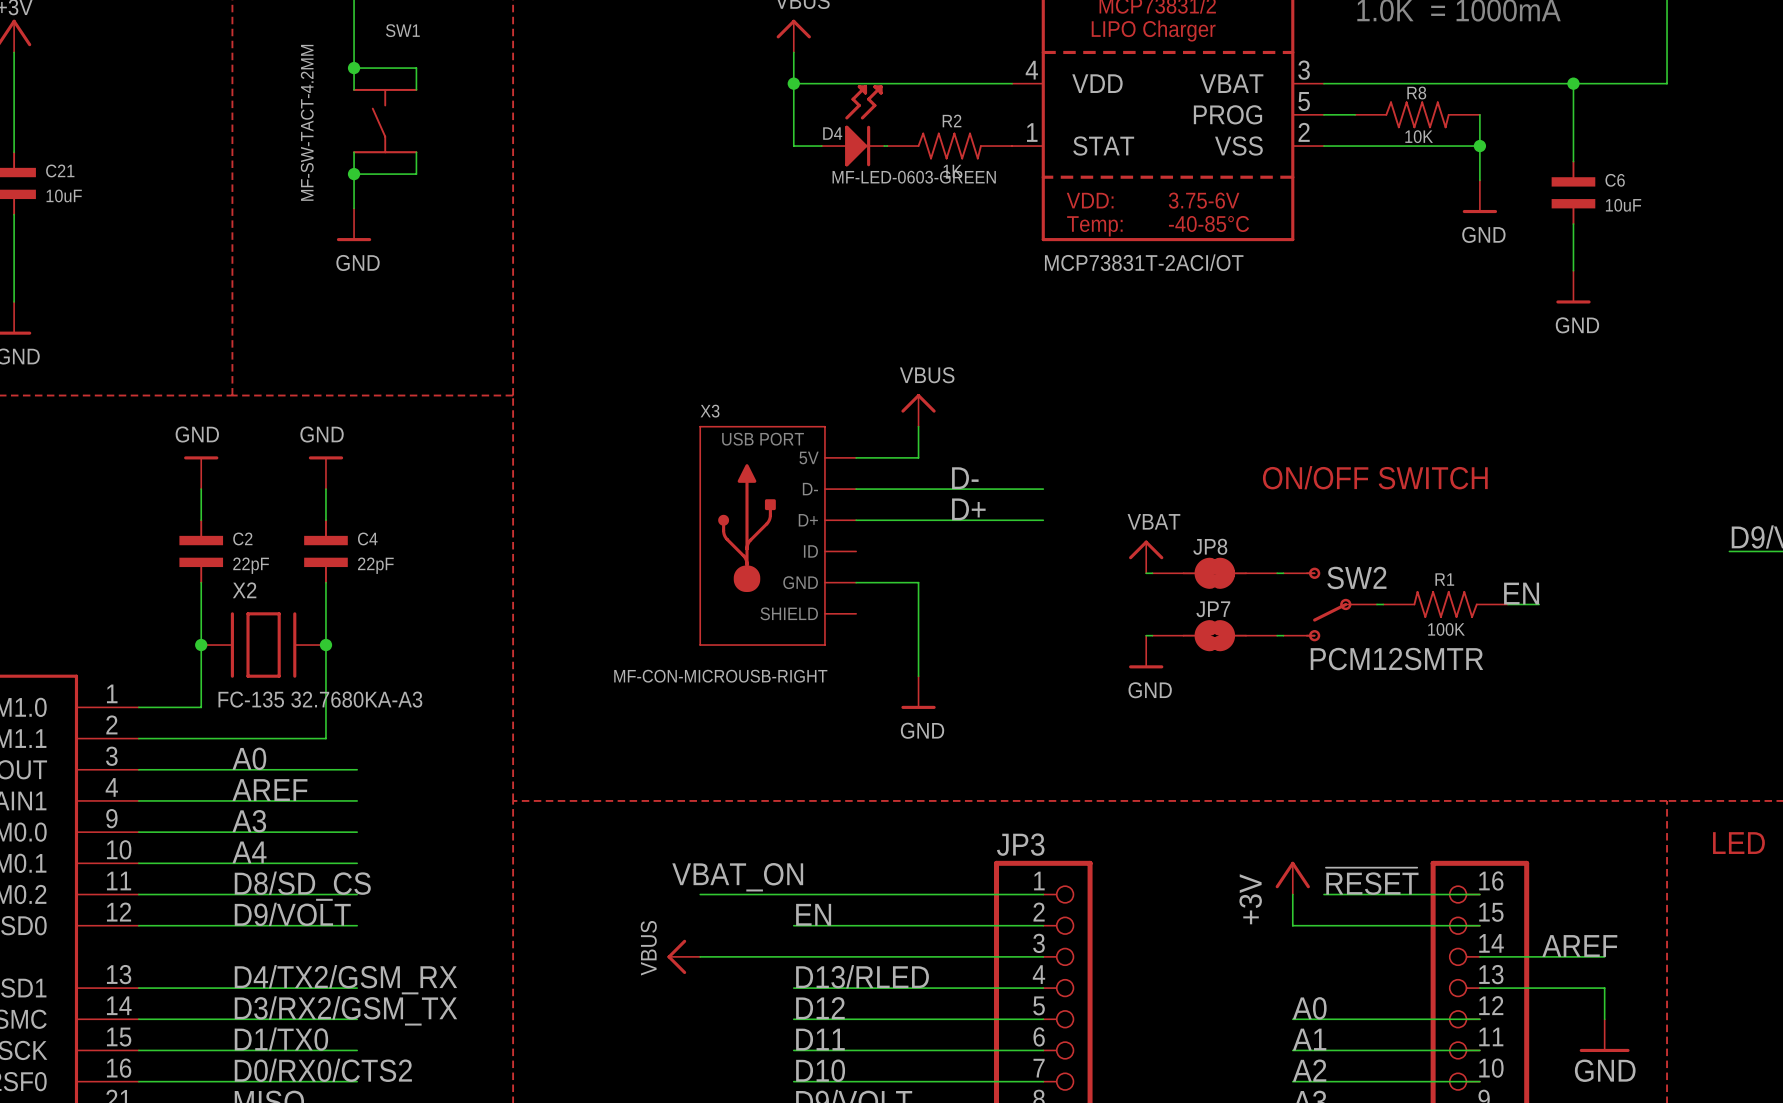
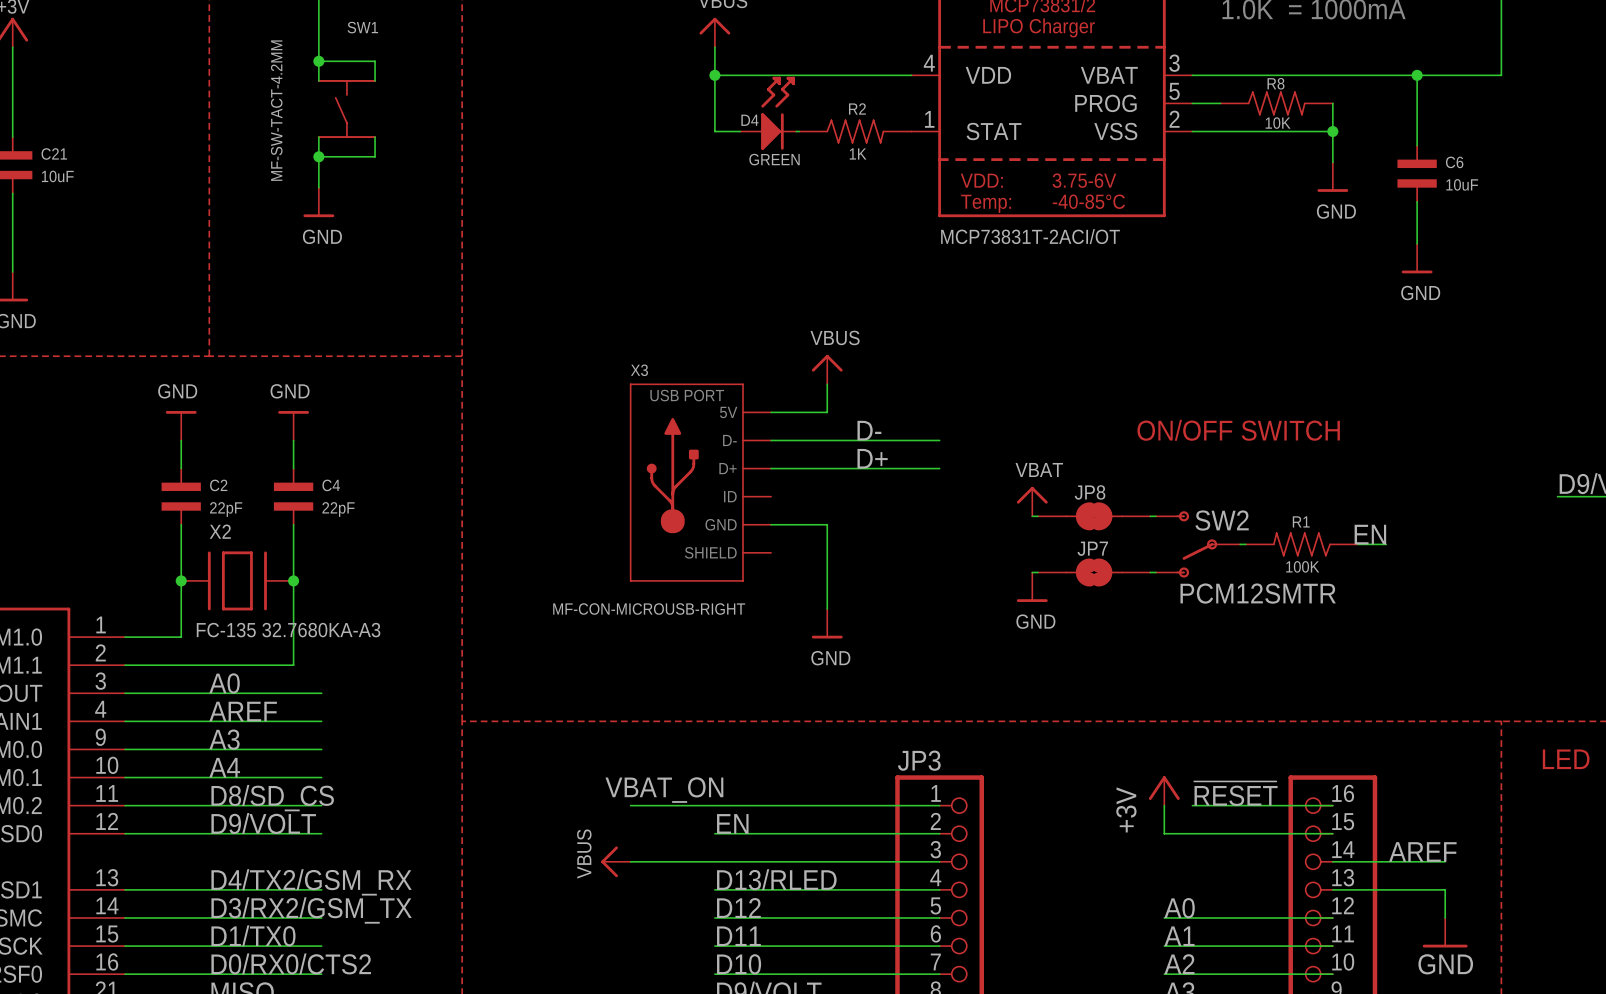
D4 value: MF-LED-0603-GREEN (914, 177) -> GREEN (774, 159)

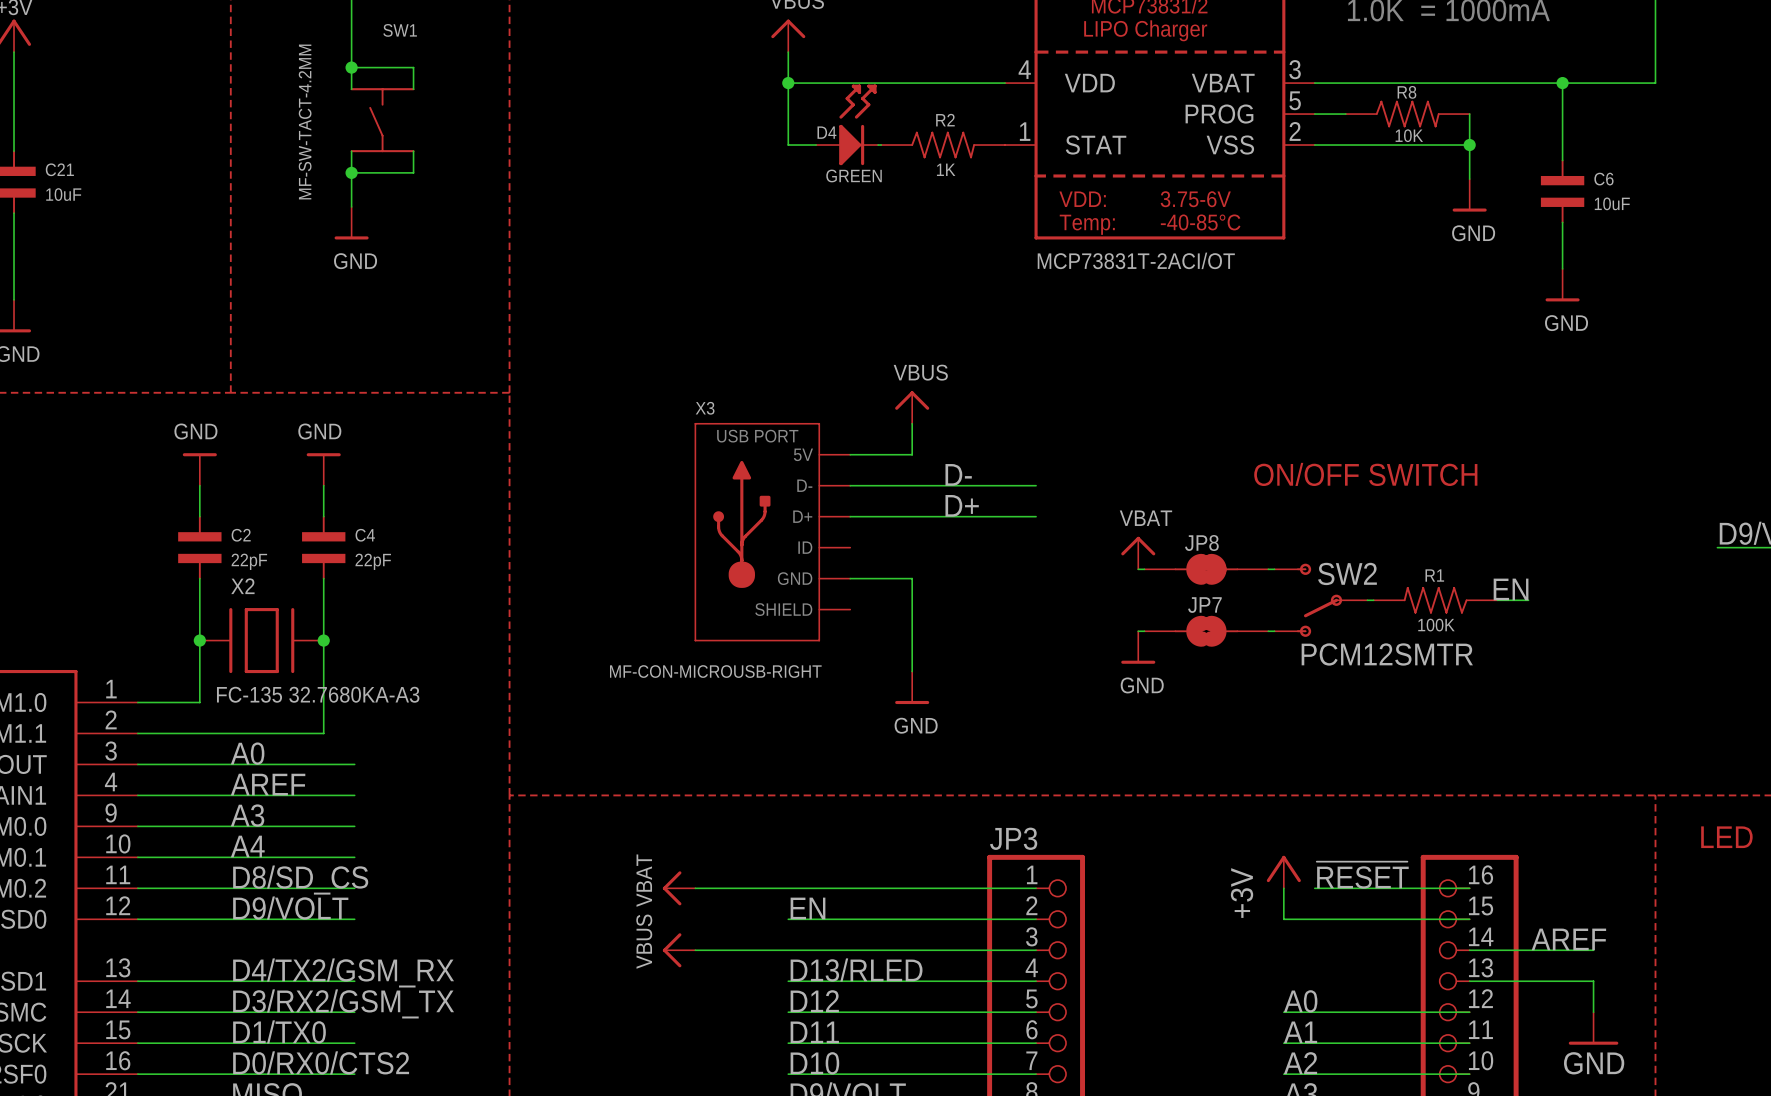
label: VBAT_ON (664, 790) -> none
power symbol: none -> VBAT (679, 888)

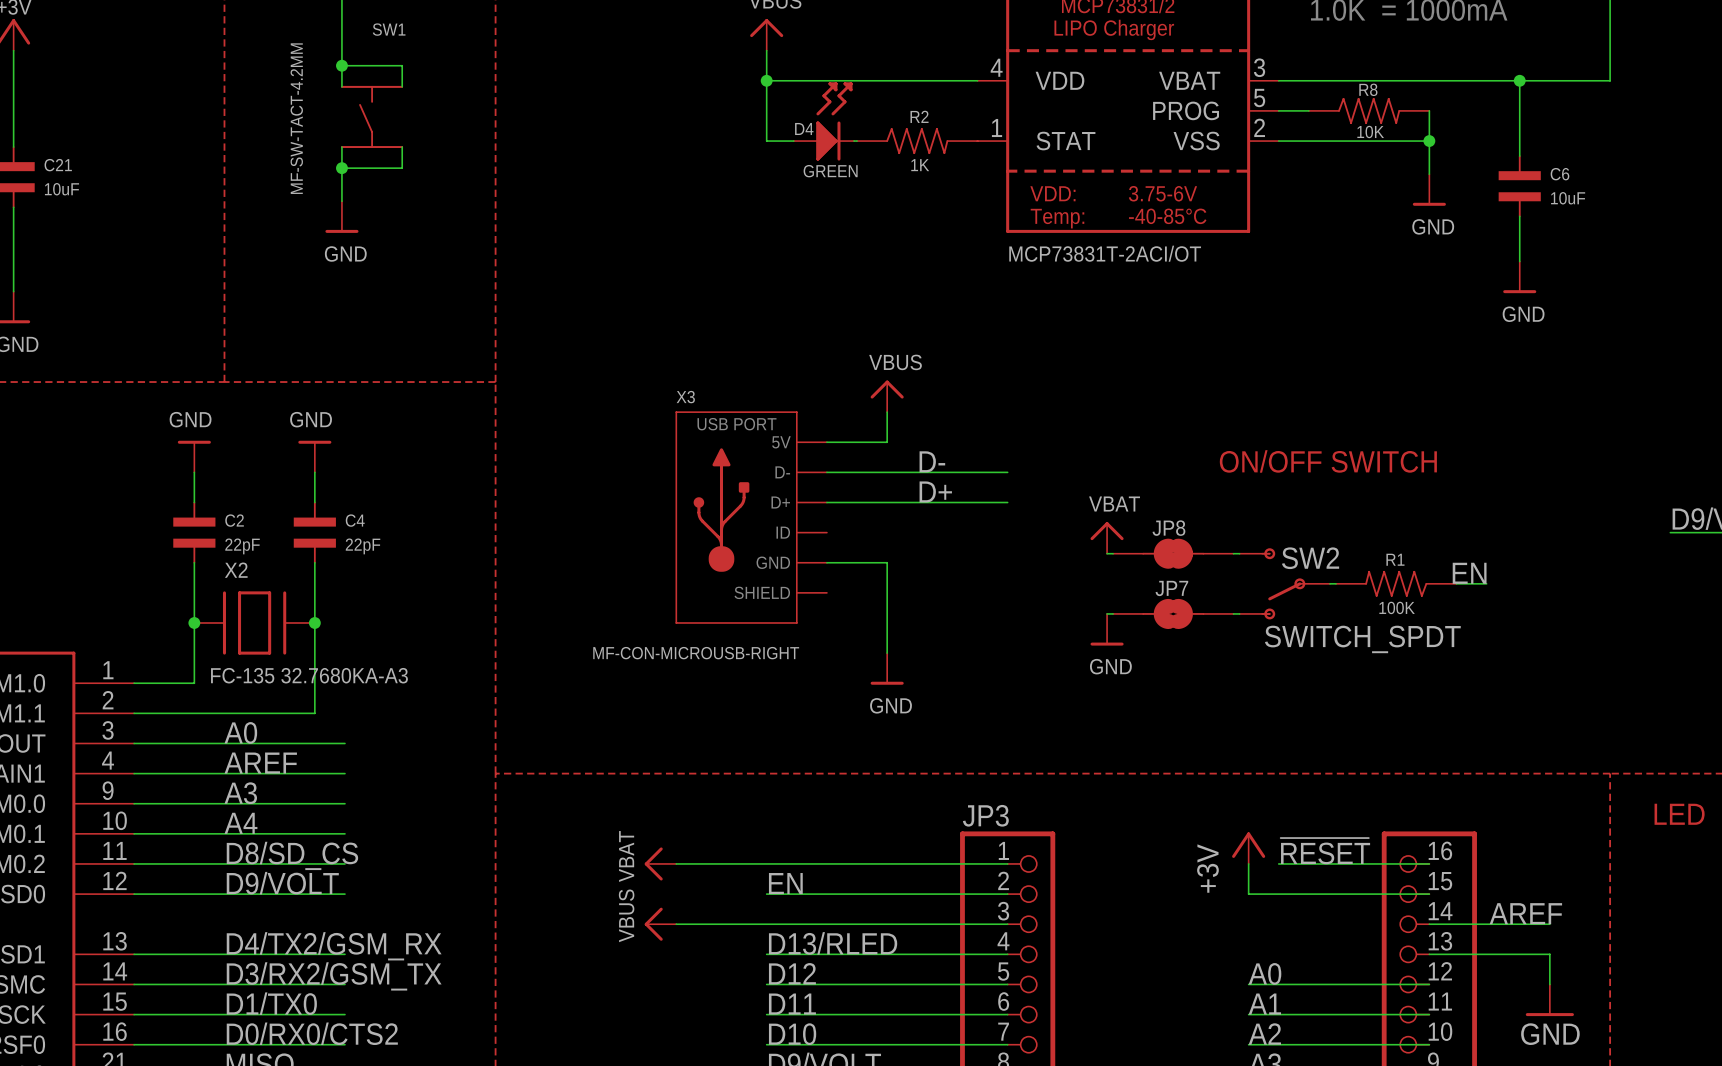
SW2 value: PCM12SMTR (1387, 654) -> SWITCH_SPDT (1362, 639)

